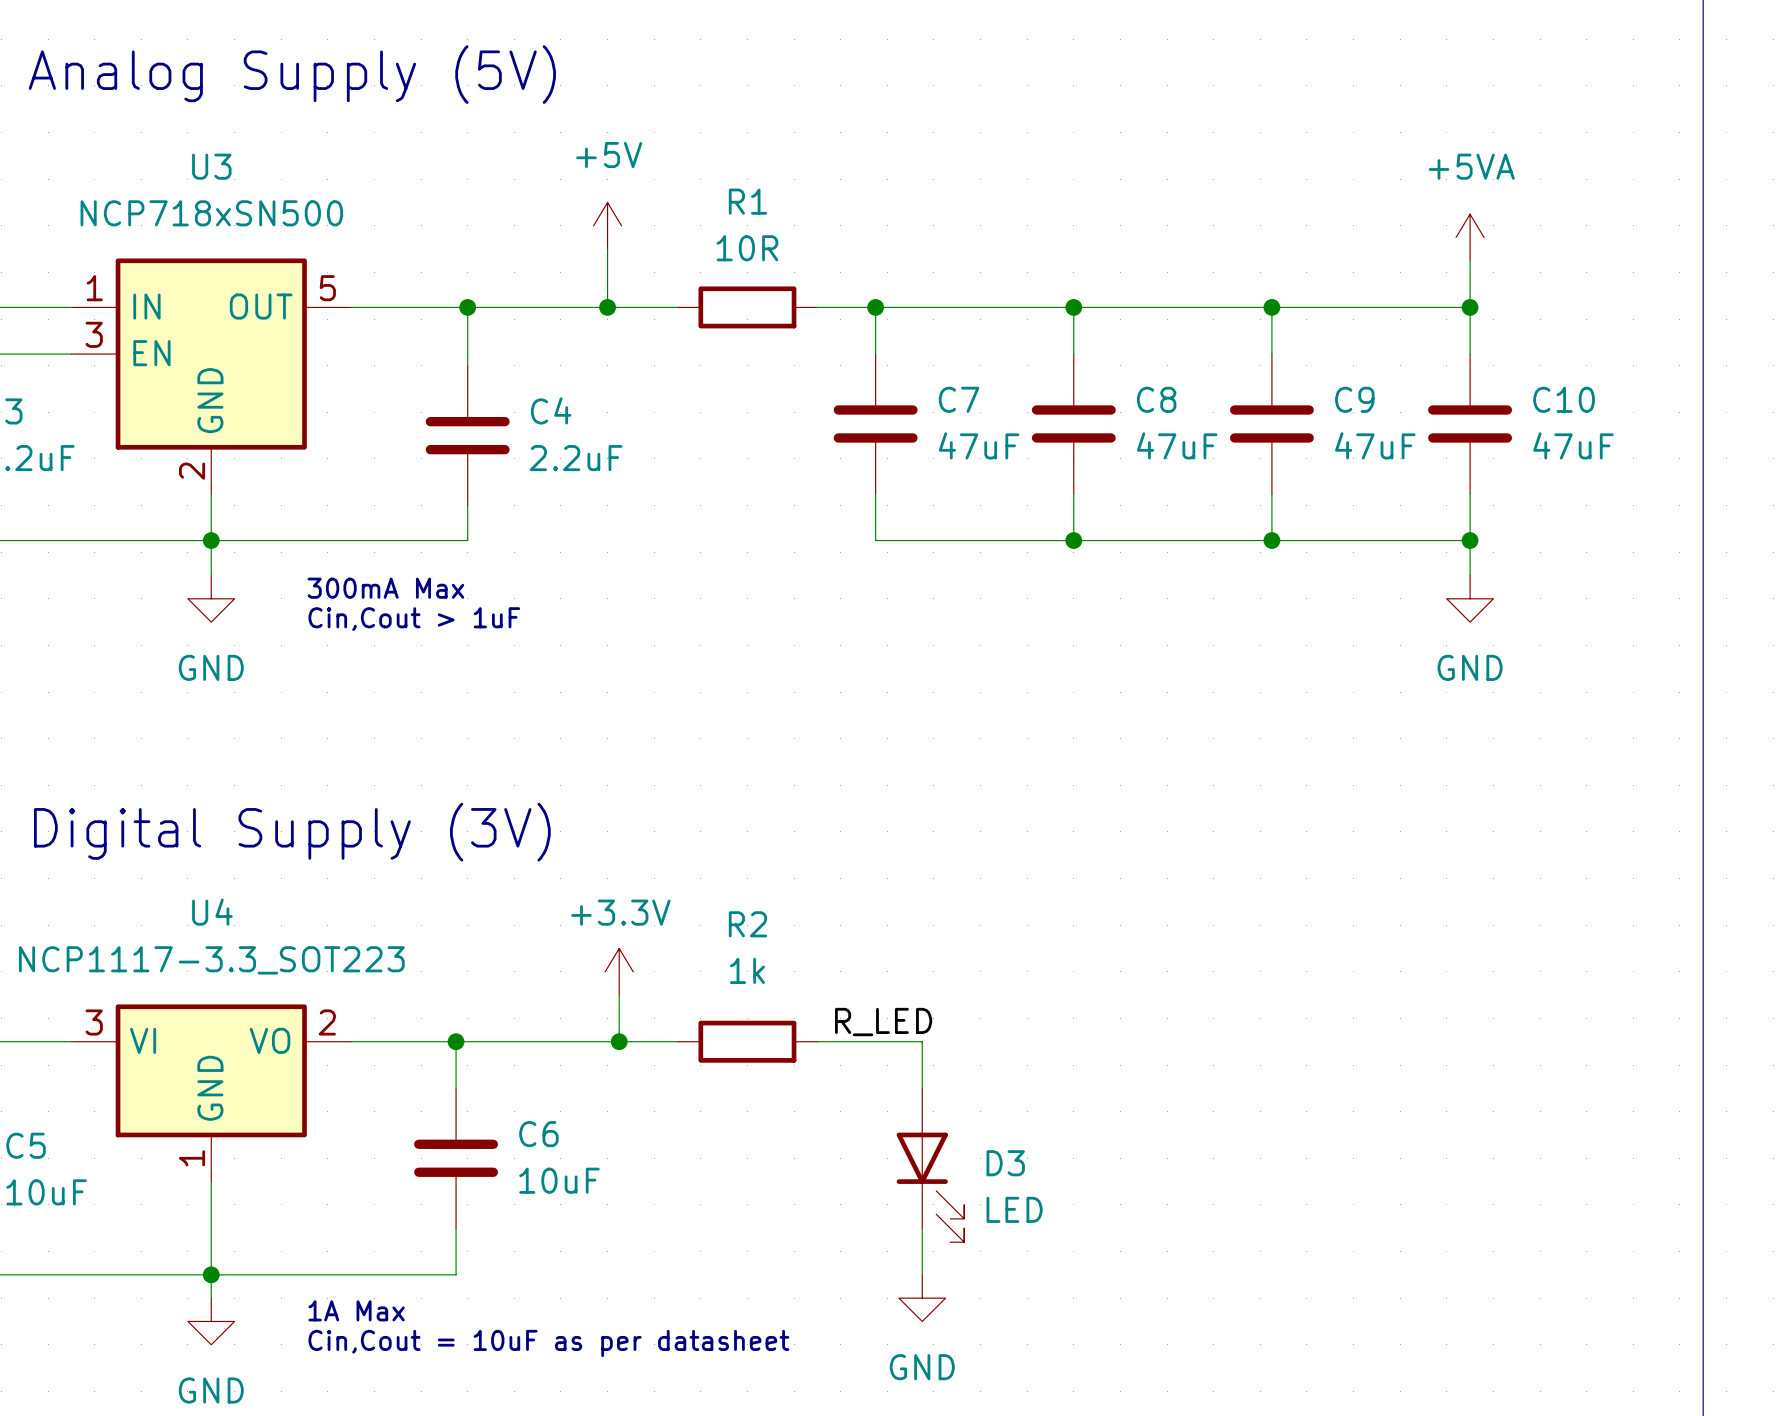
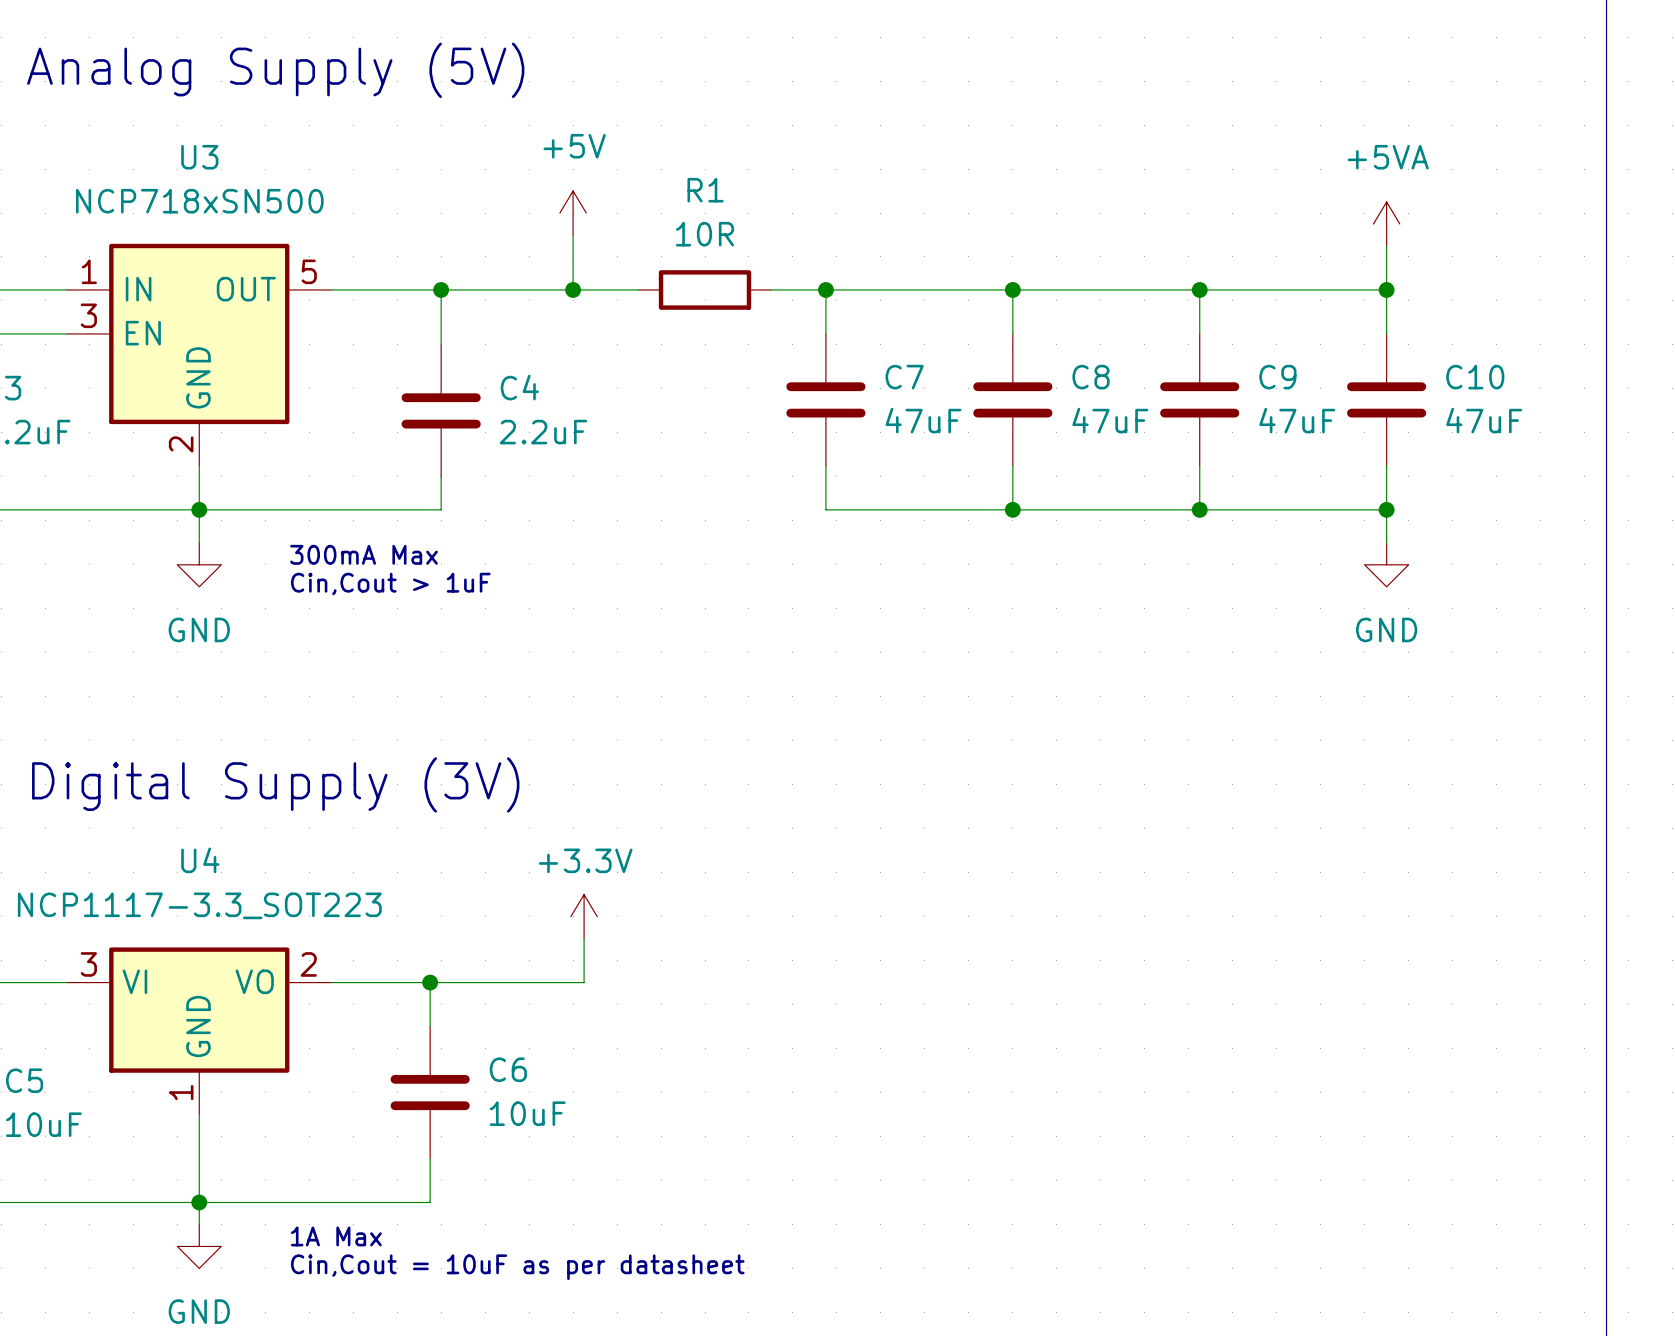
label: R_LED (883, 1022) -> none
wire: (619, 1041) (677, 1041) -> none
junction: (619, 1041) -> none
R2: 1k (747, 1041) -> none
wire: (817, 1041) (922, 1041) (922, 1088) -> none
D3: LED (930, 1165) -> none
wire: (922, 1228) (922, 1274) -> none
power symbol: GND (922, 1298) -> none

